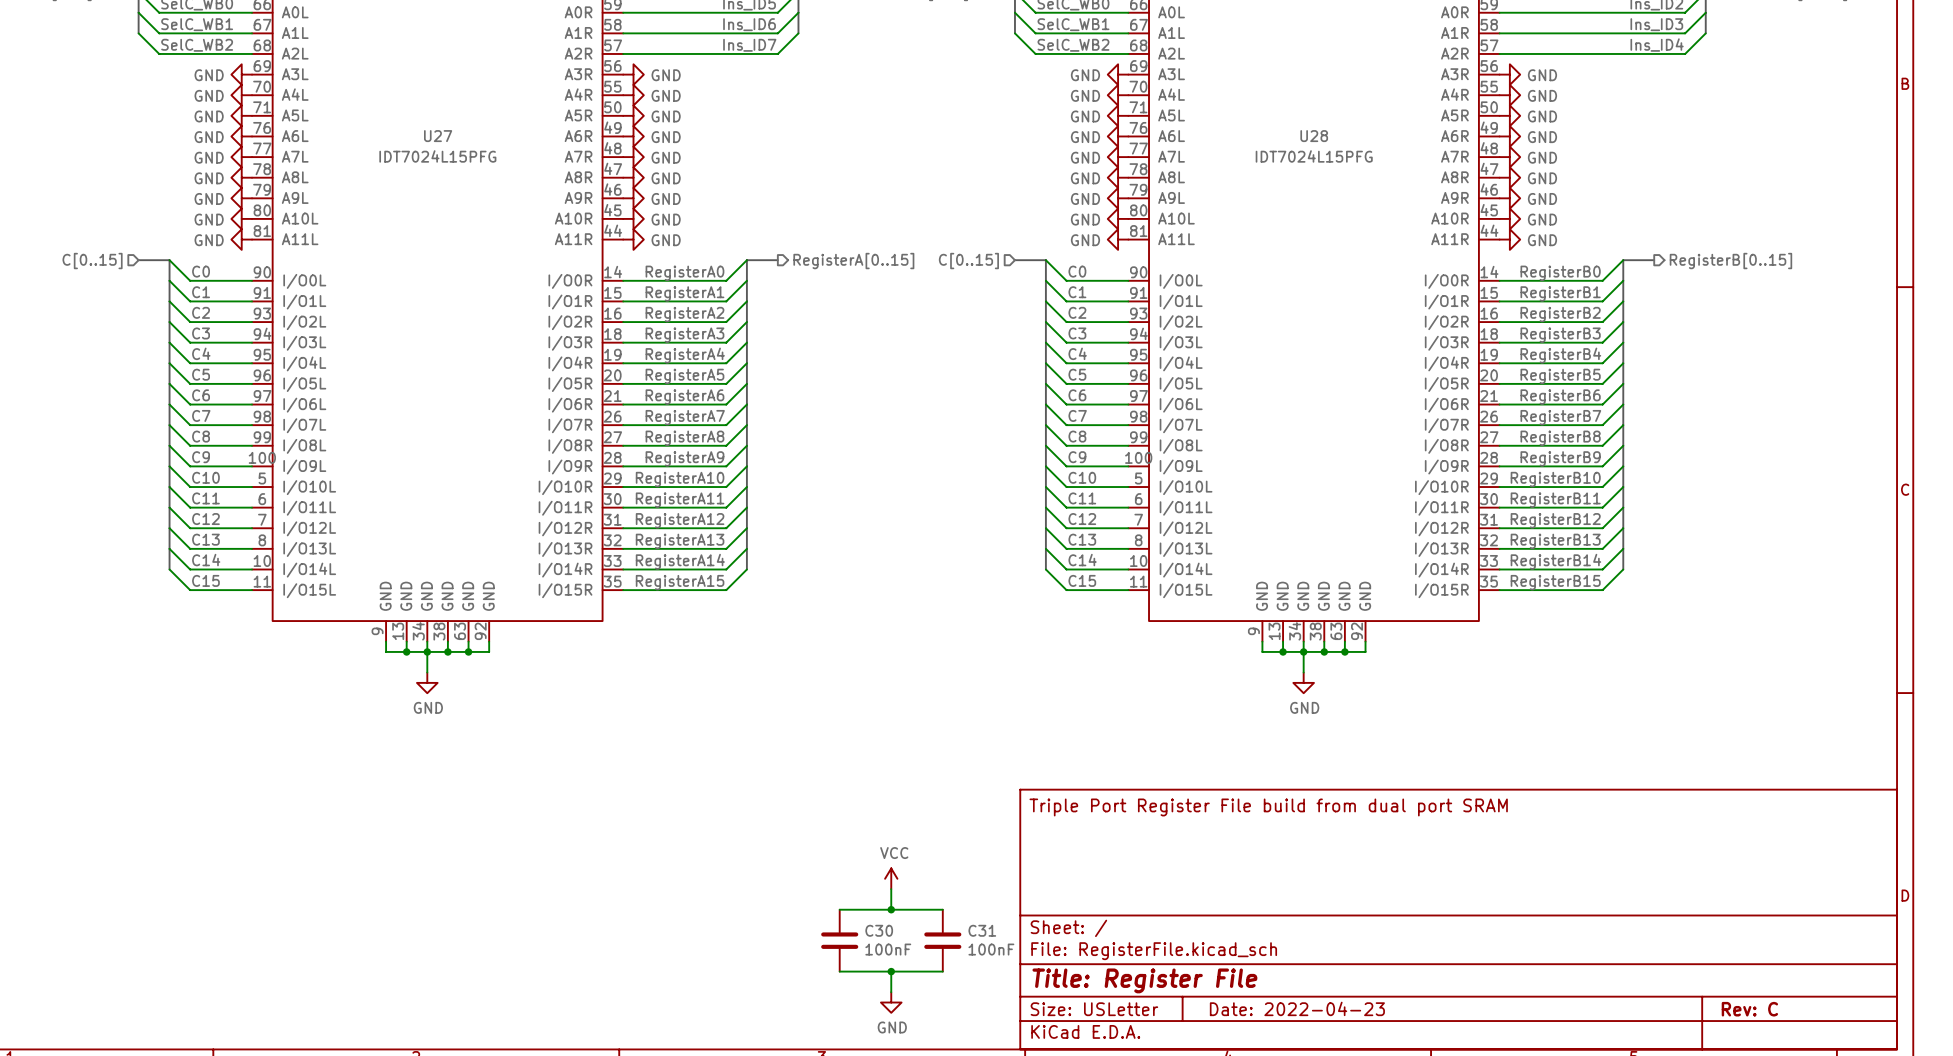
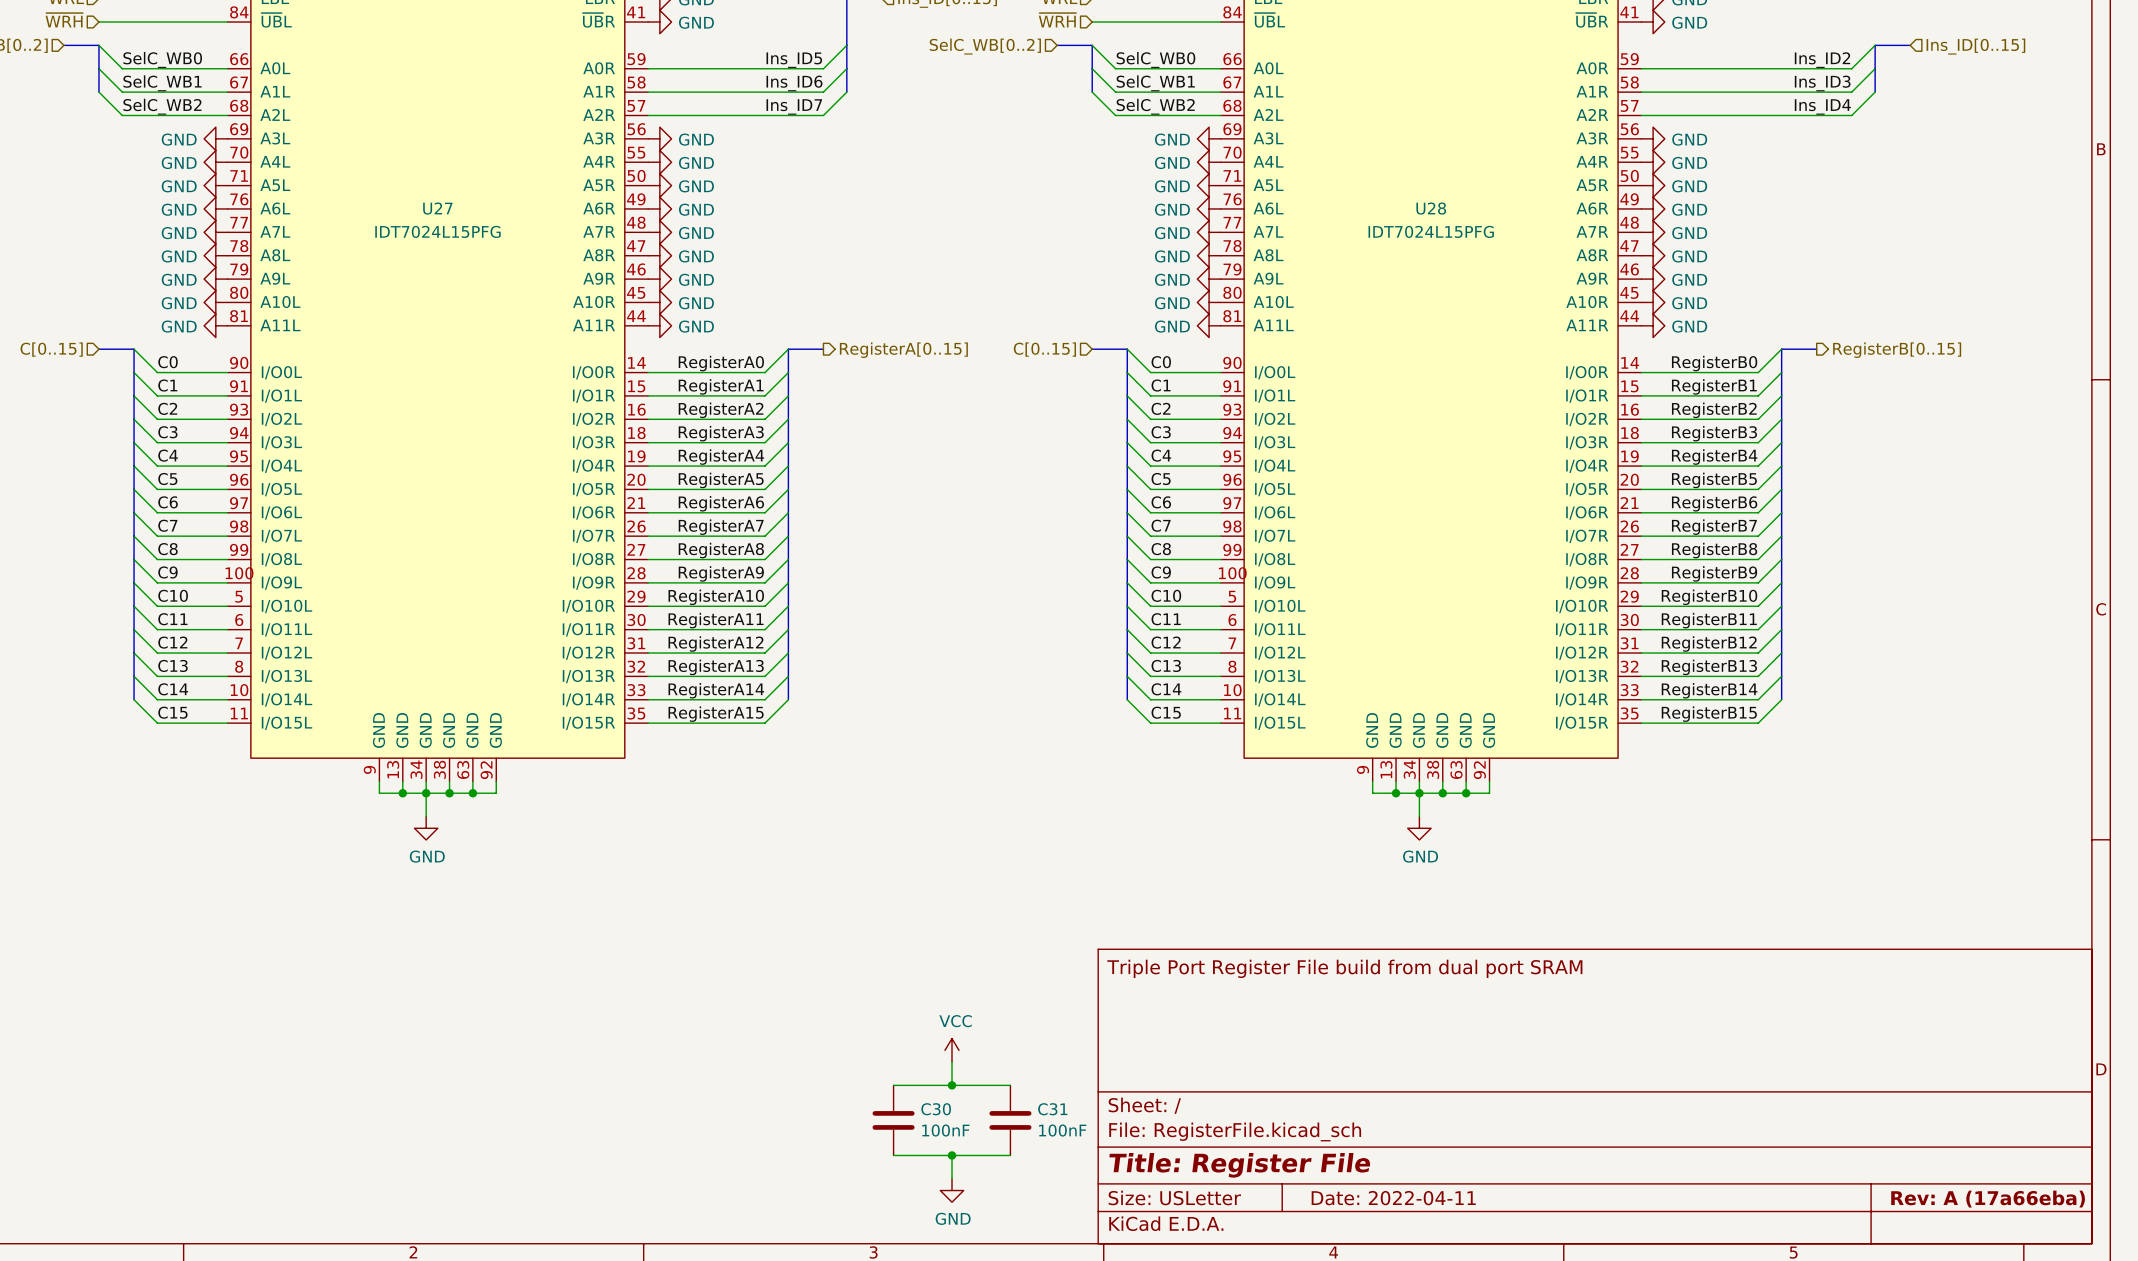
title block: Date: 2022-04-23 (1297, 1008) -> Date: 2022-04-11 (1393, 1198)
title block: Rev: C (1749, 1009) -> Rev: A (17a66eba) (1988, 1199)

